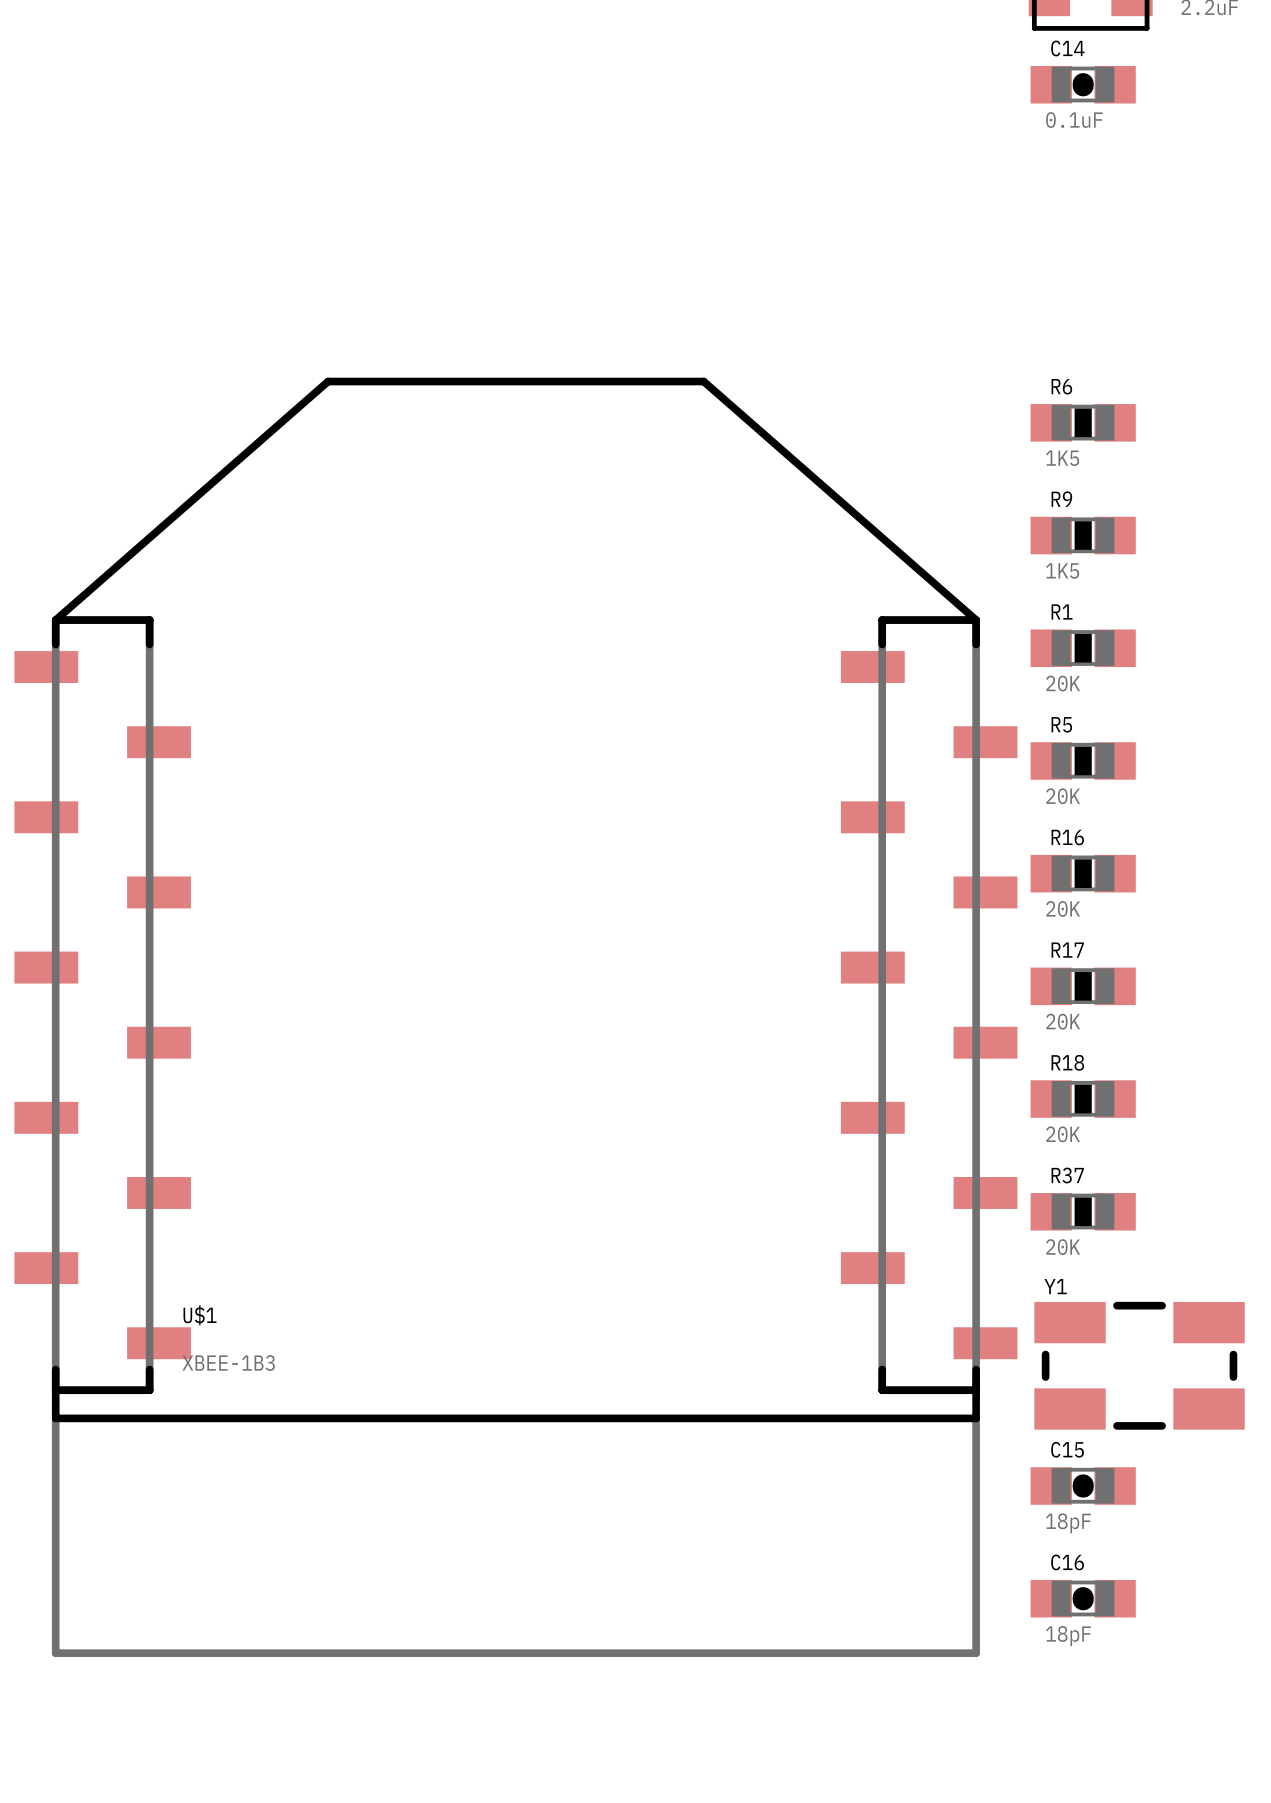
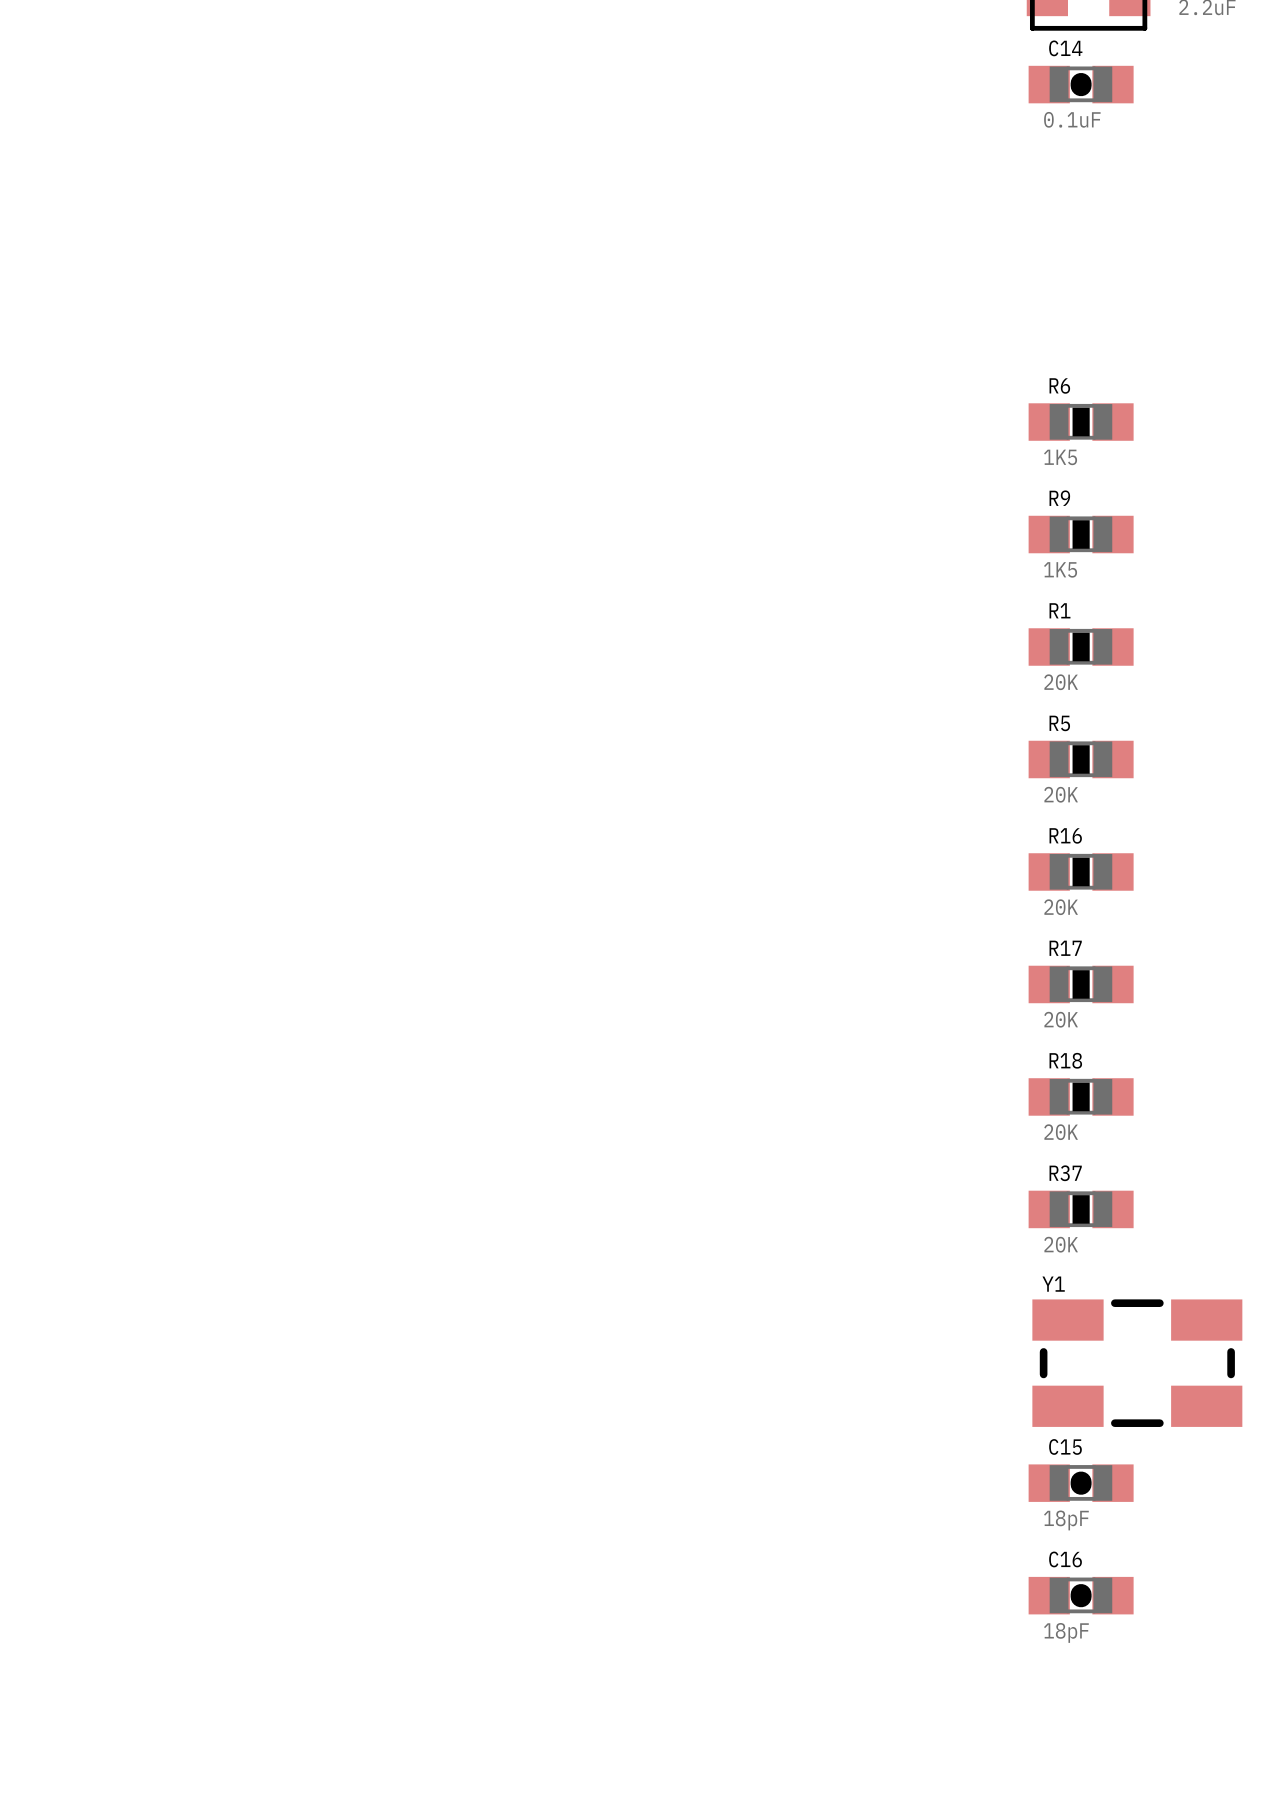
U$1: XBEE-1B3 (515, 1017) -> none

